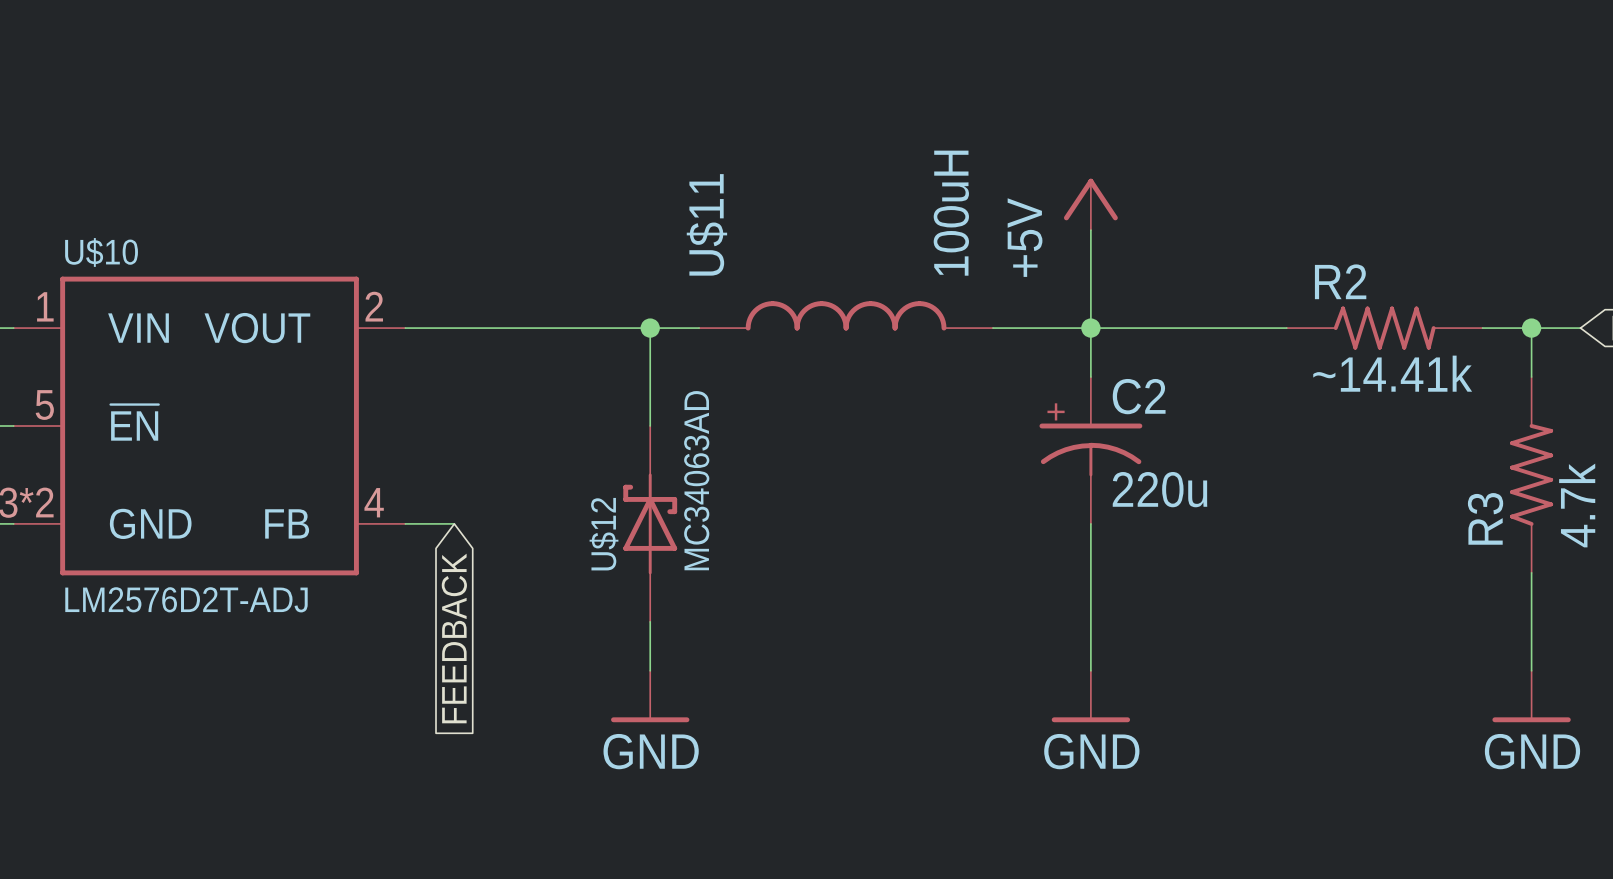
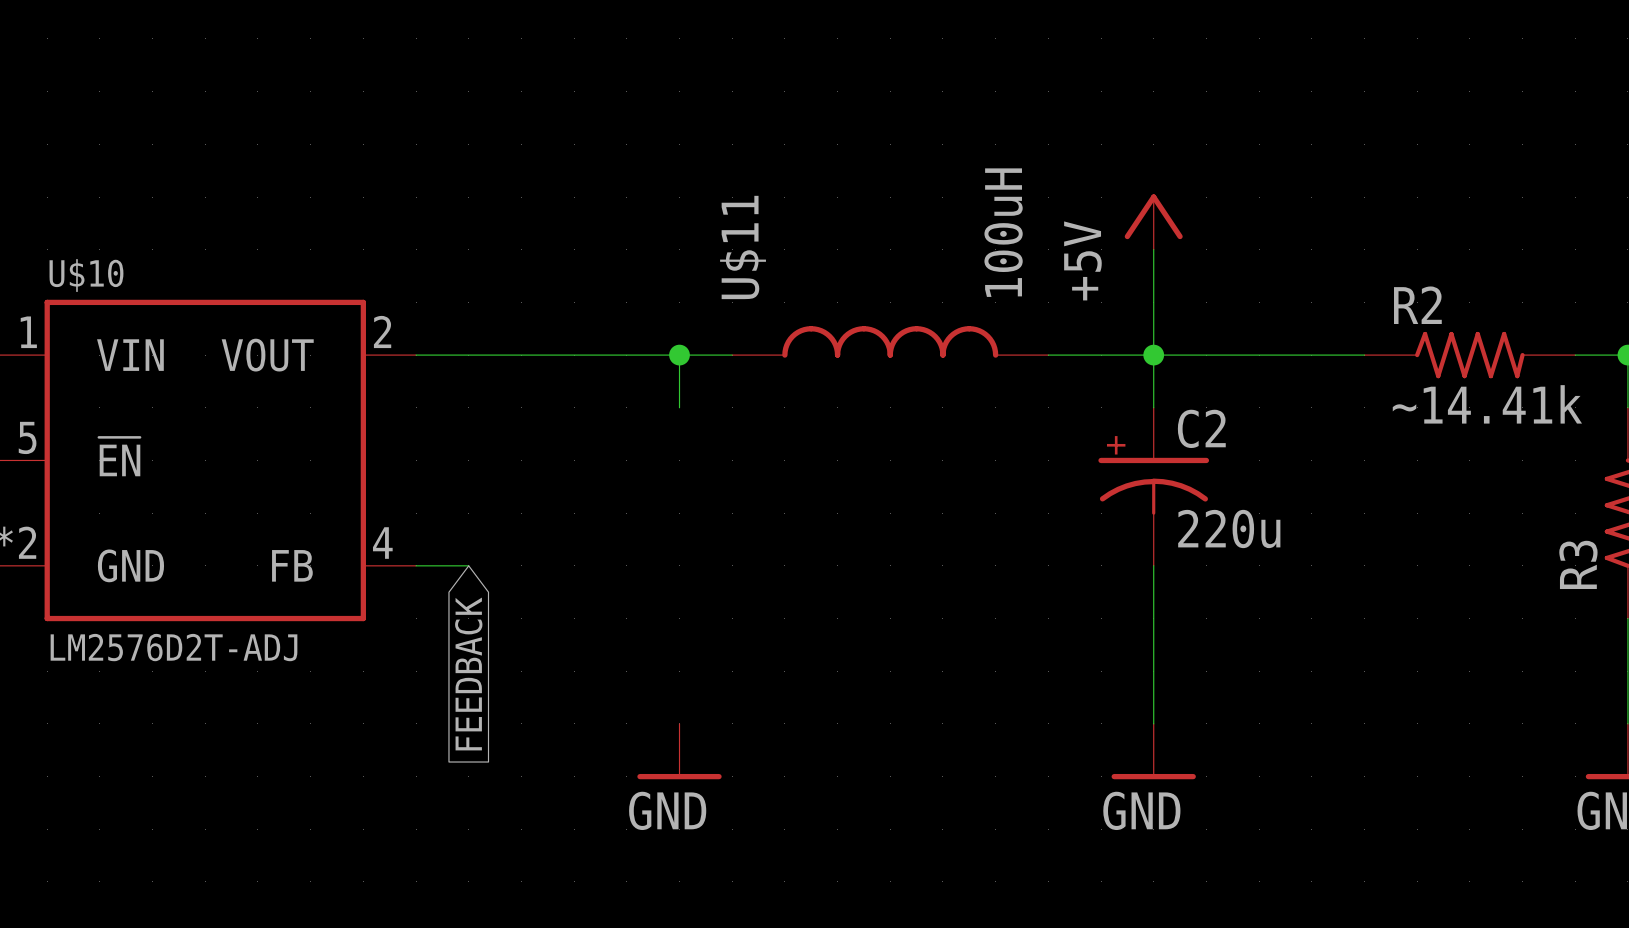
wire: (650, 377) (650, 425) -> none
U$12: MC34063AD (650, 523) -> none
wire: (650, 621) (650, 670) -> none

